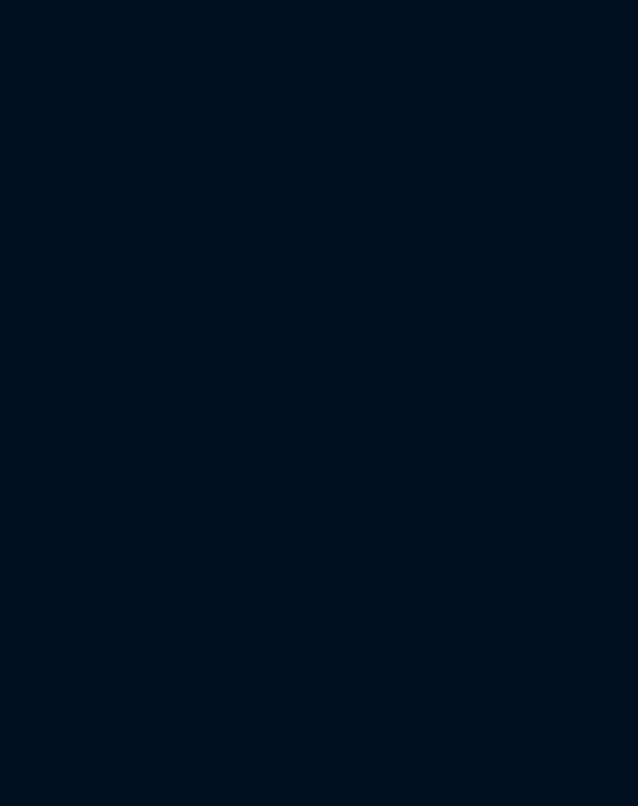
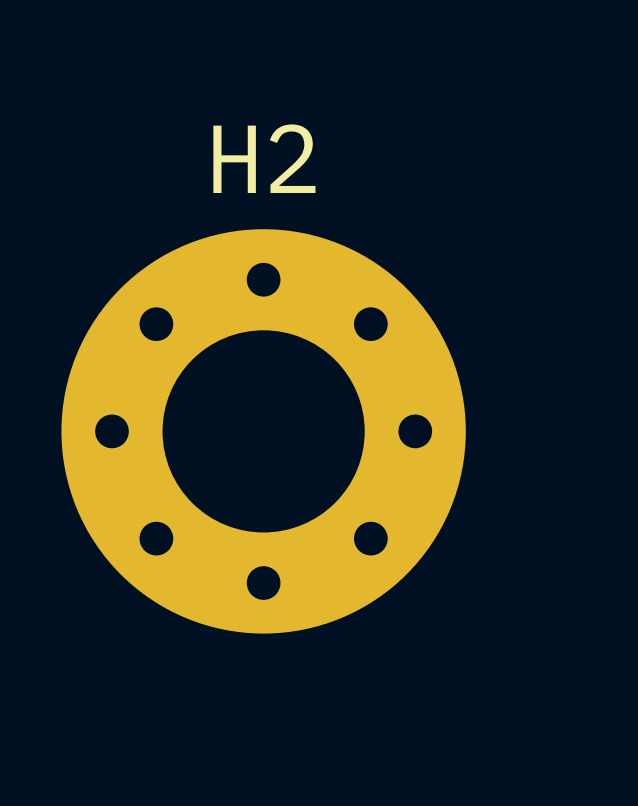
H2: none -> (263, 431)

